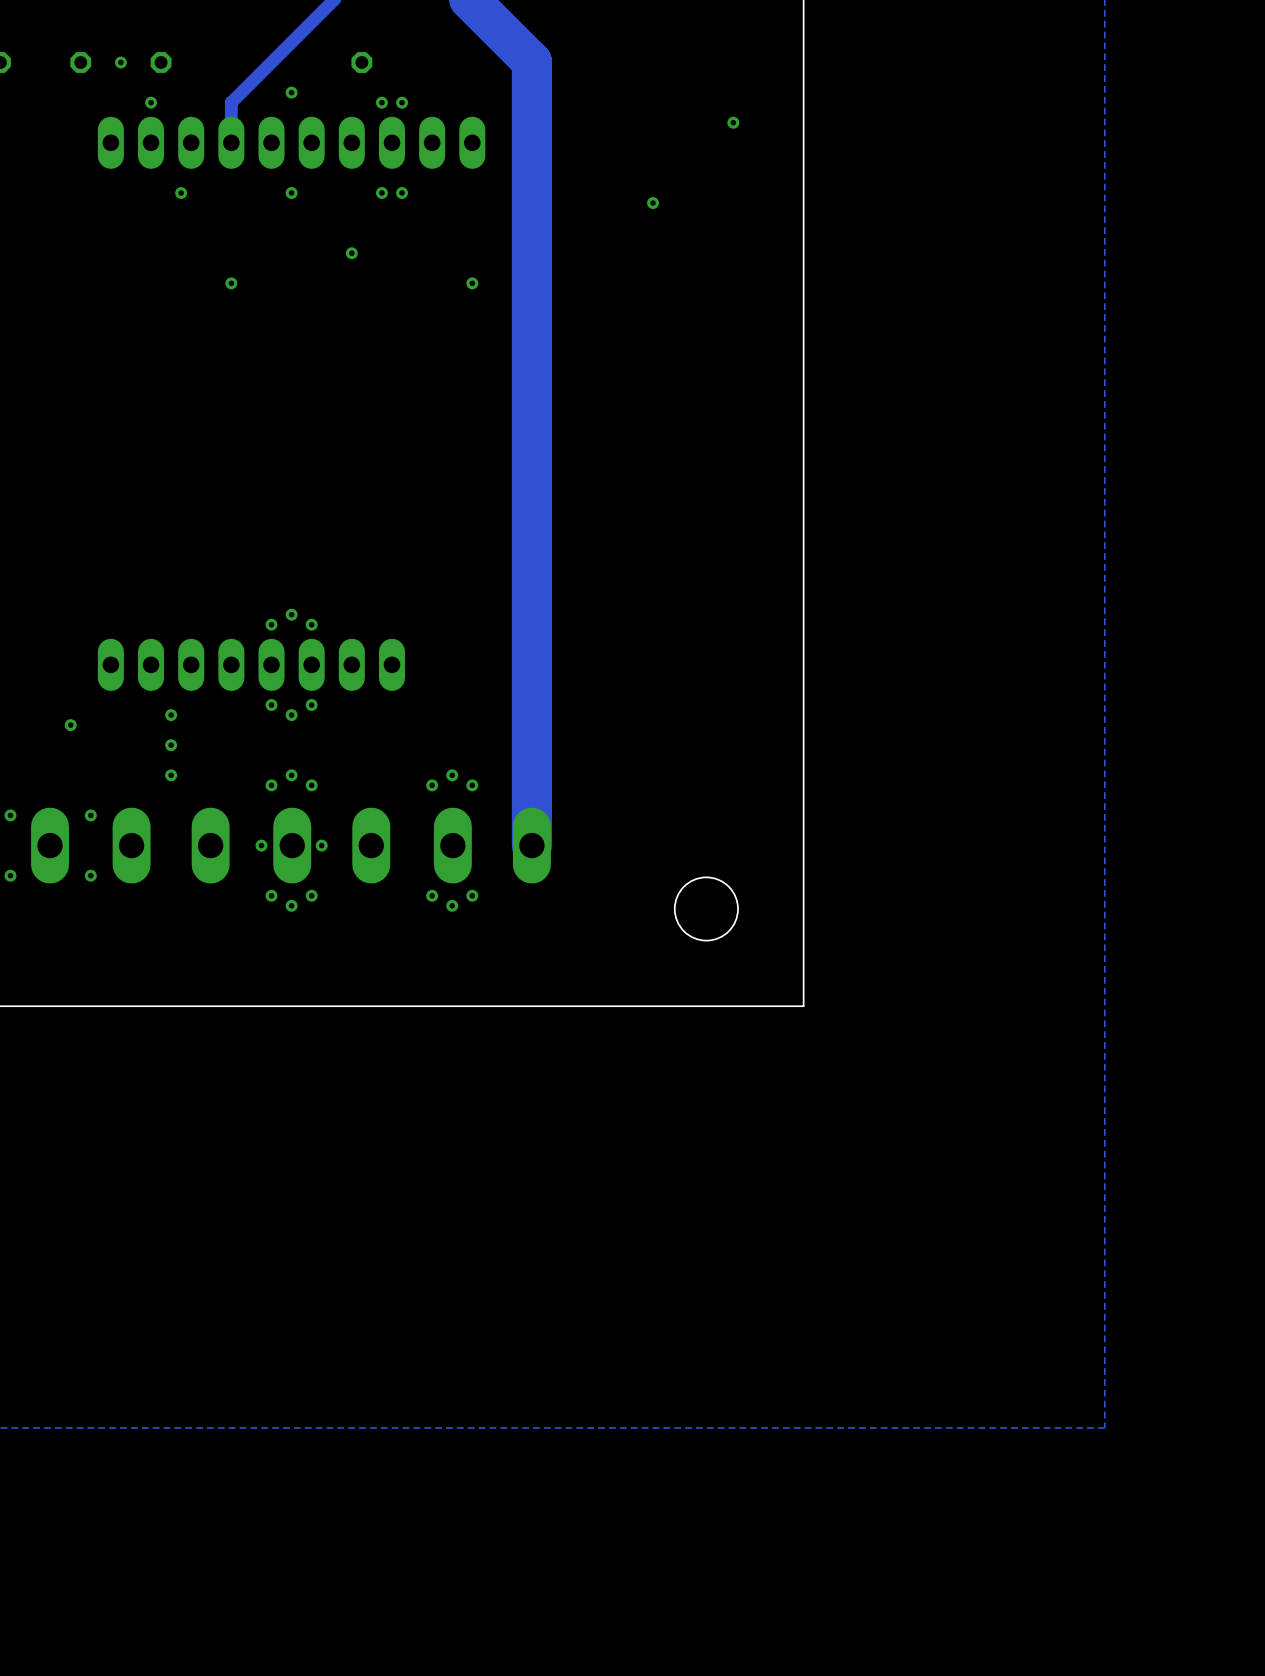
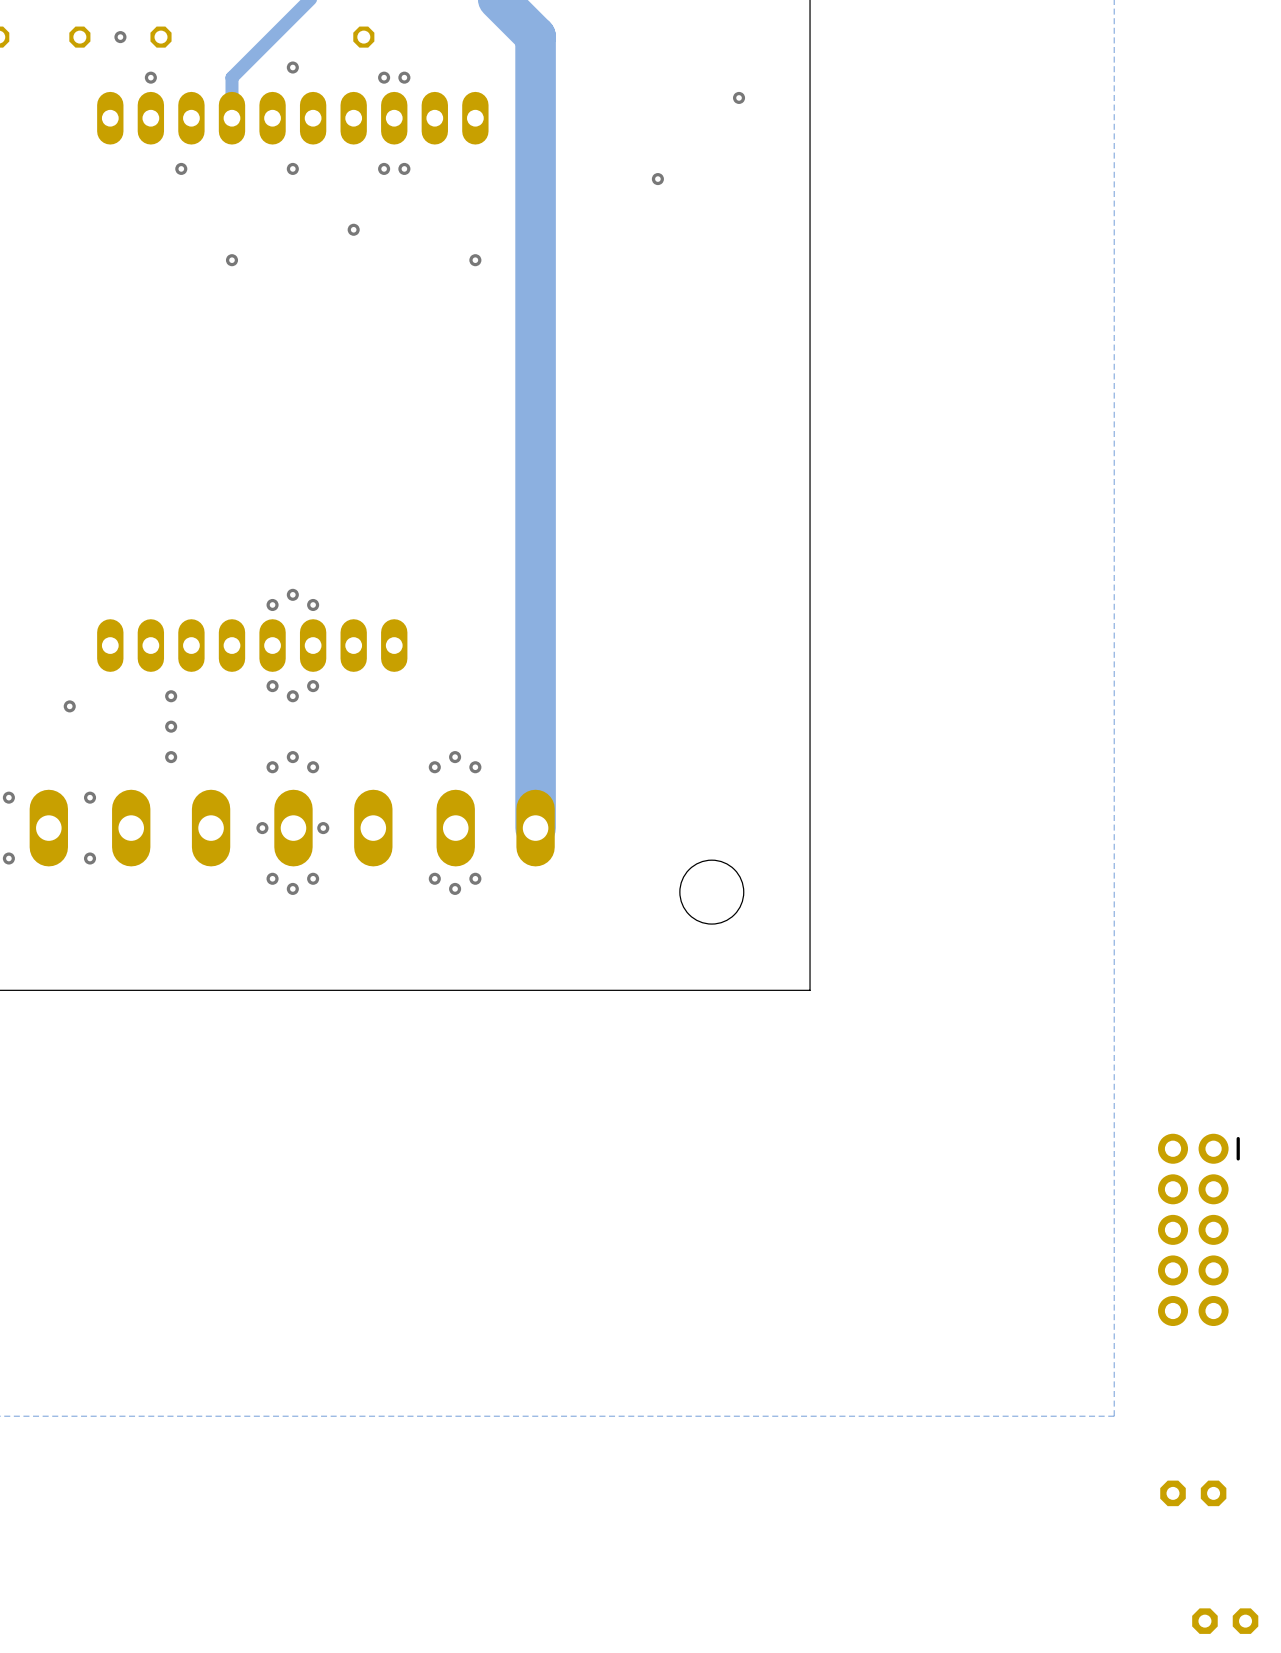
part: none -> (1198, 1229)
part: none -> (1193, 1493)
part: none -> (1225, 1621)

